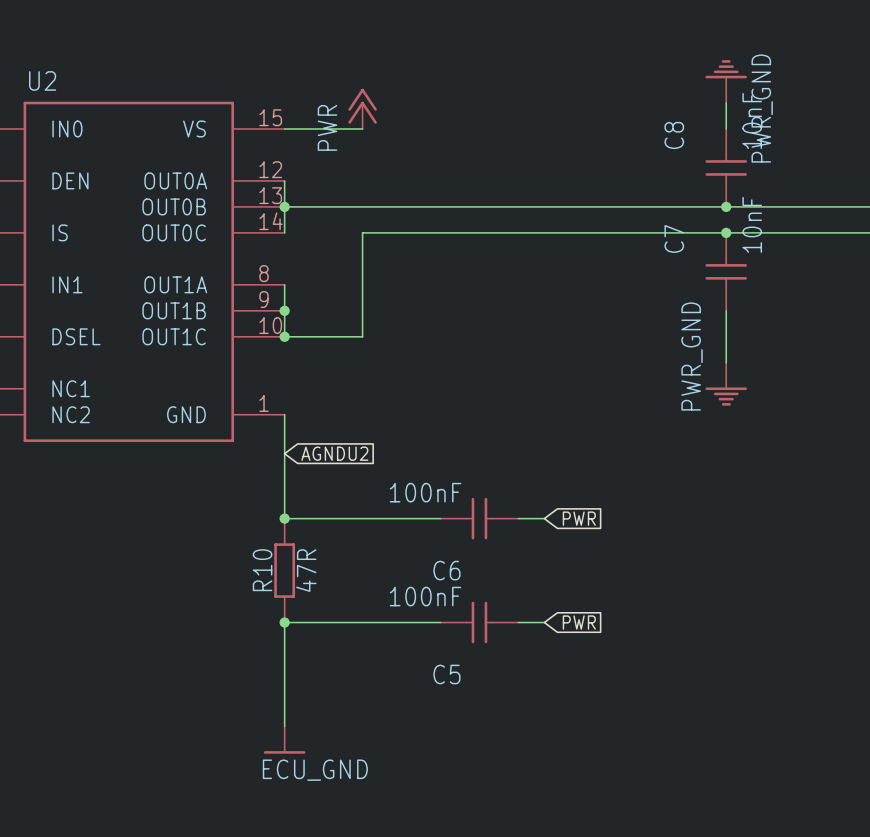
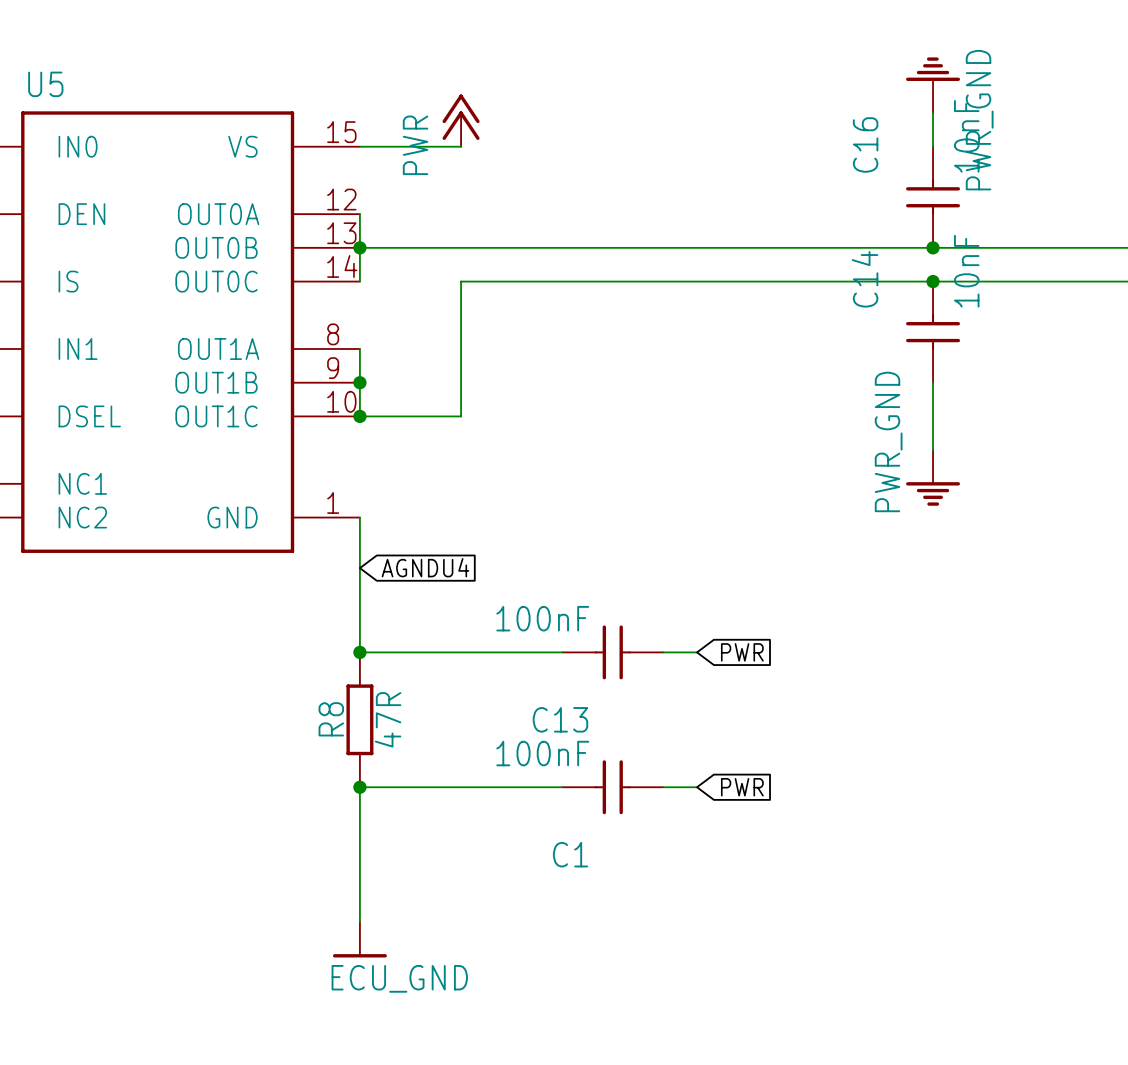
U2 name: U2 (42, 80) -> U5 (45, 84)
C8 name: C8 (674, 135) -> C16 (865, 144)
C7 name: C7 (674, 238) -> C14 (865, 279)
global label: AGNDU2 (334, 453) -> AGNDU4 (425, 567)
R10 name: R10 (262, 570) -> R8 (331, 719)
C6 name: C6 (446, 570) -> C13 (560, 719)
C5 name: C5 (446, 674) -> C1 (570, 854)

